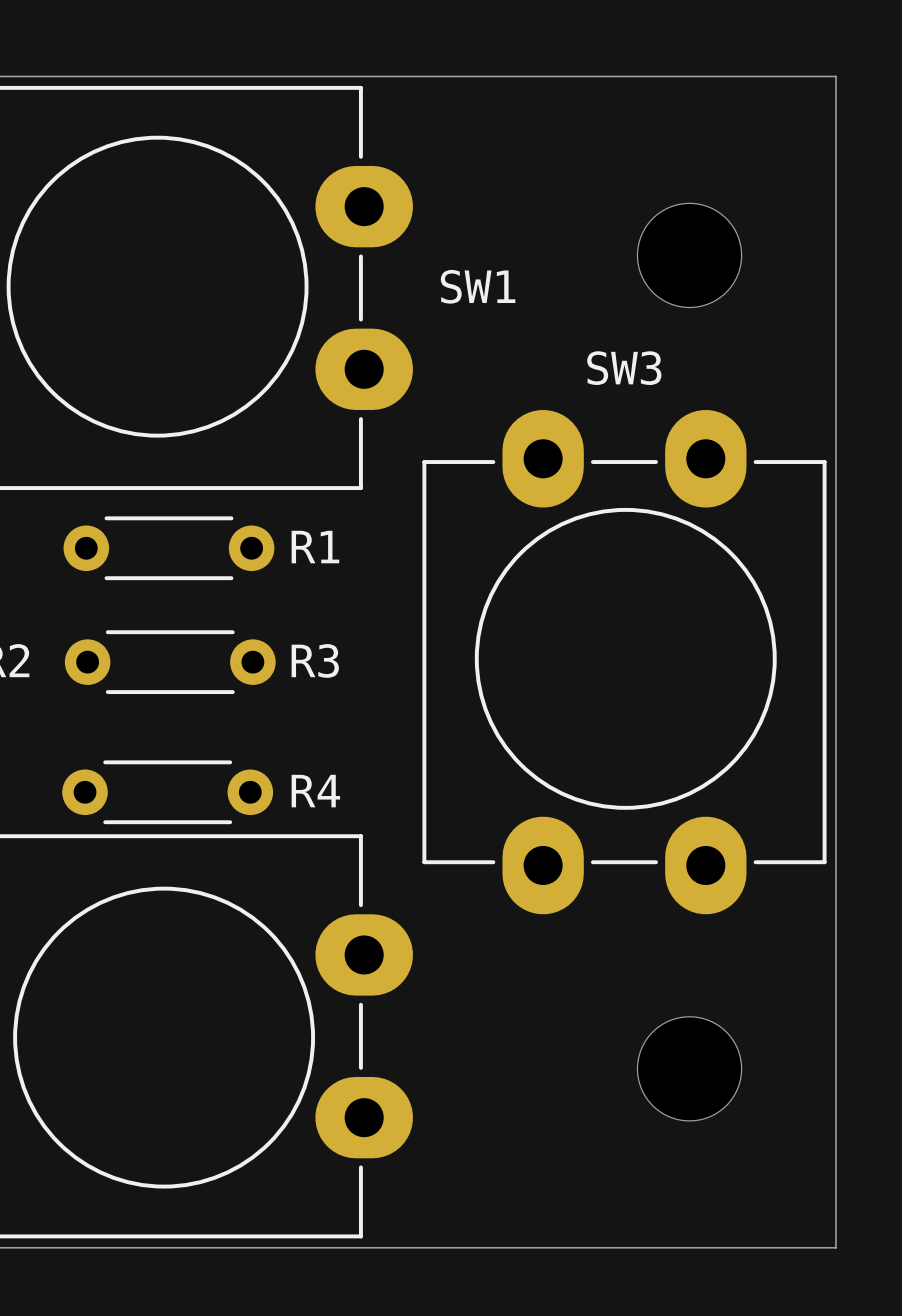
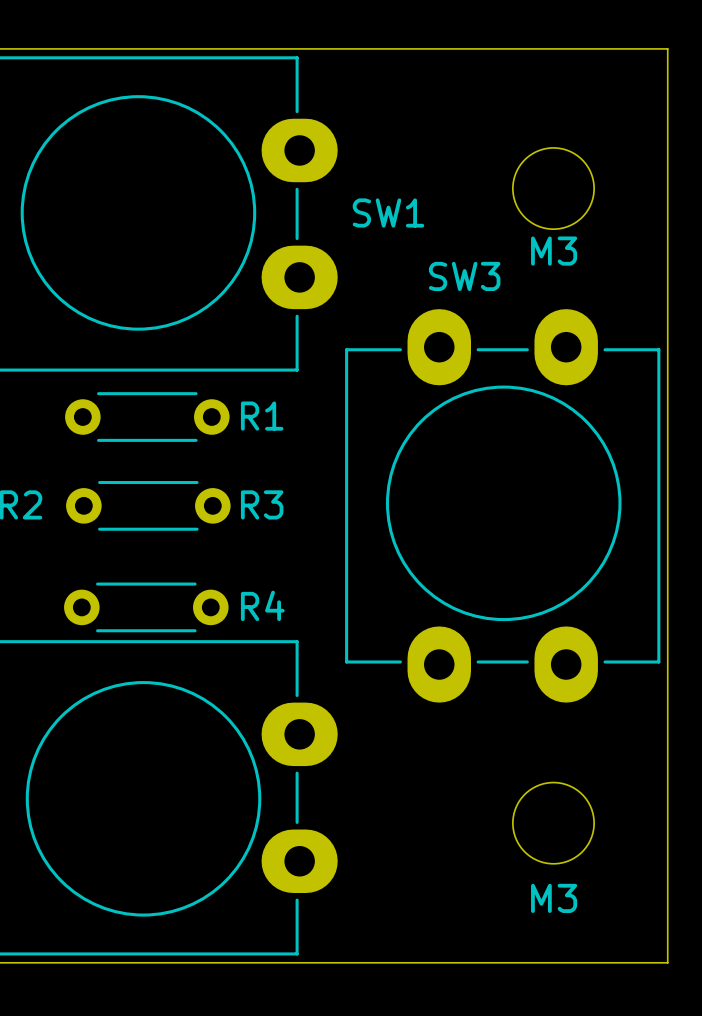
M3 name: none -> M3 (554, 251)
SW3 name position: SW3 (624, 368) -> SW3 (464, 276)
M3 name: none -> M3 (554, 898)

